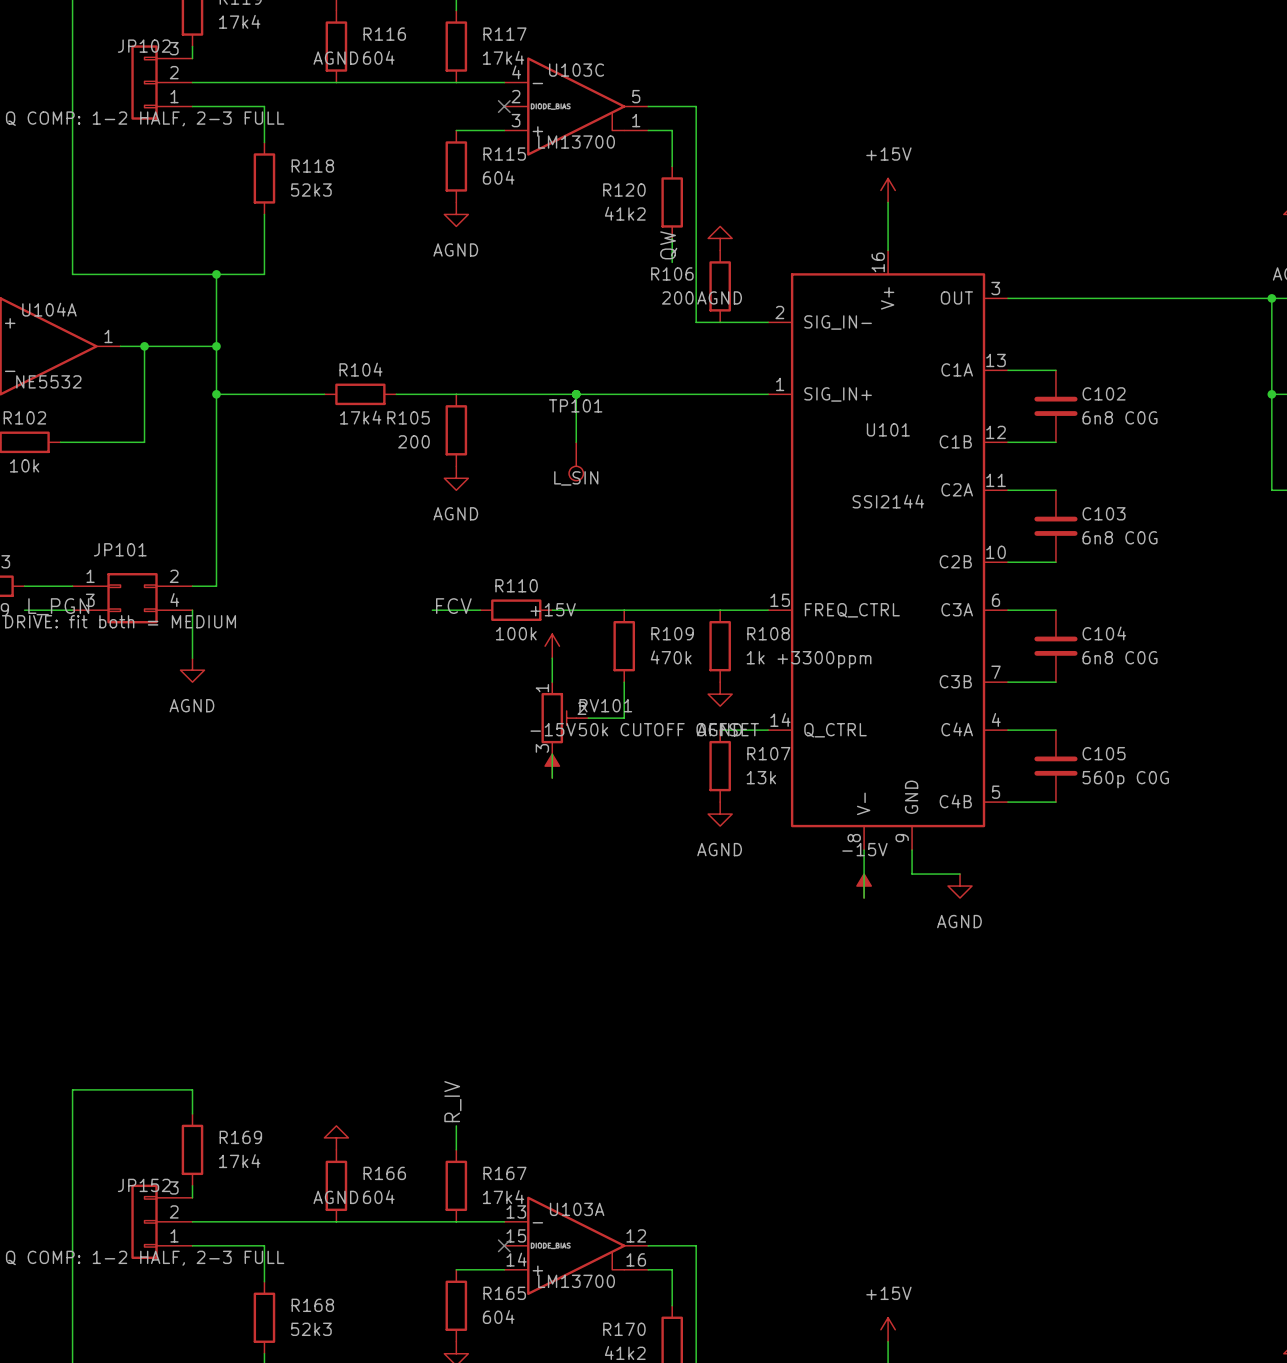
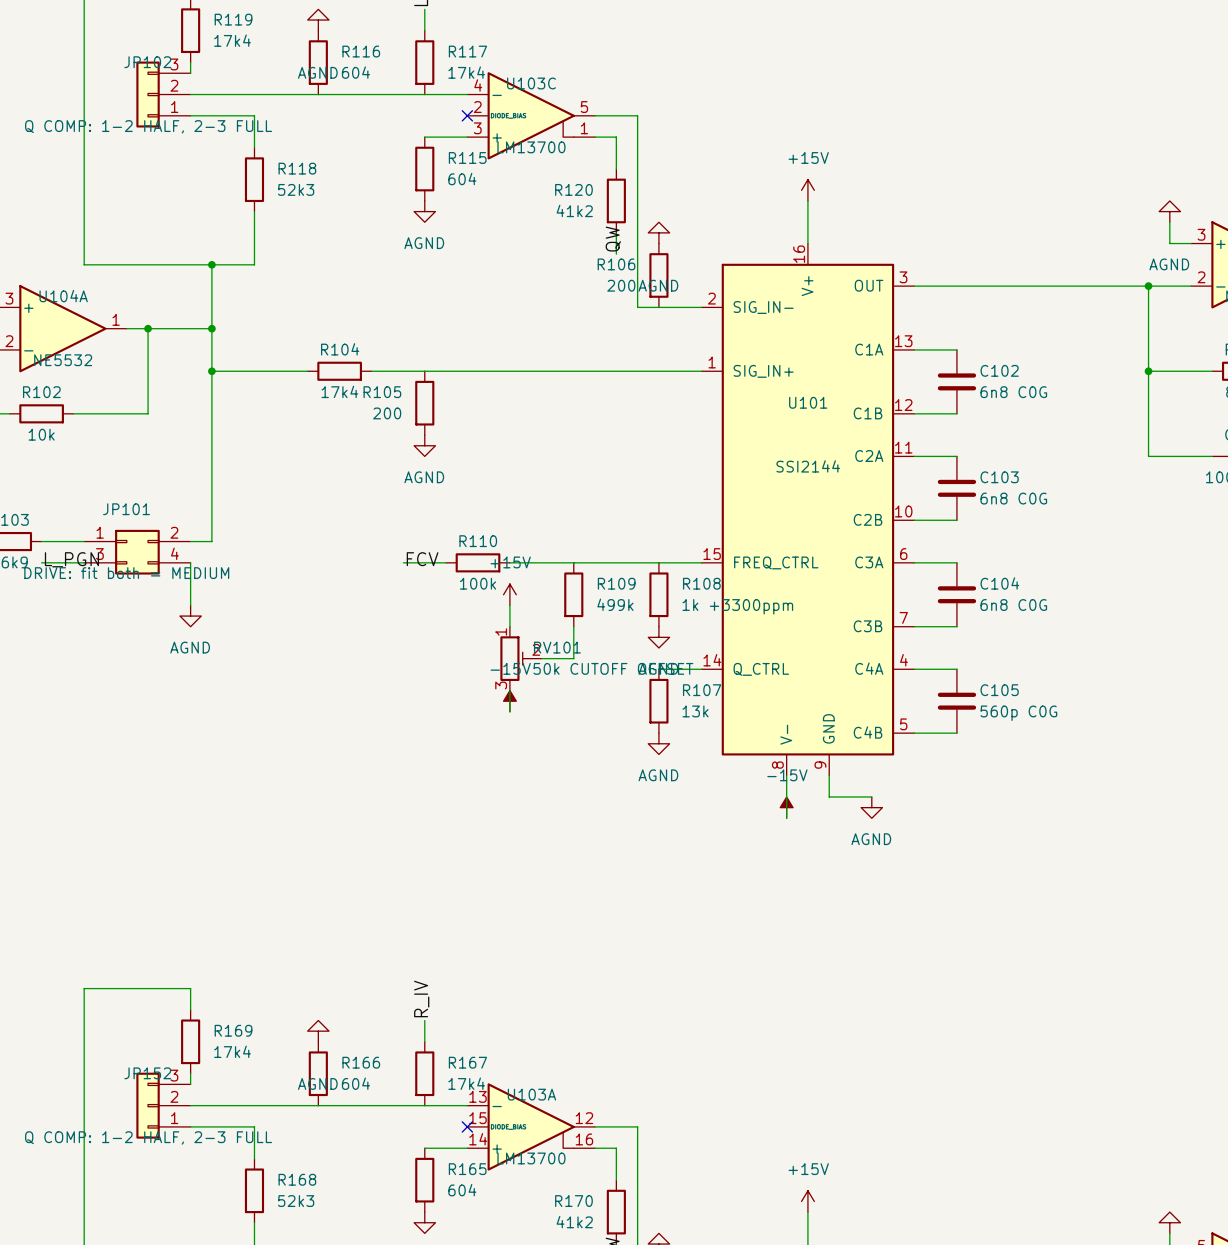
wire: (576, 394) (576, 442) -> none
junction: (576, 394) -> none
TP101: L_SIN (576, 461) -> none
R109 value: 470k (671, 657) -> 499k (615, 604)

